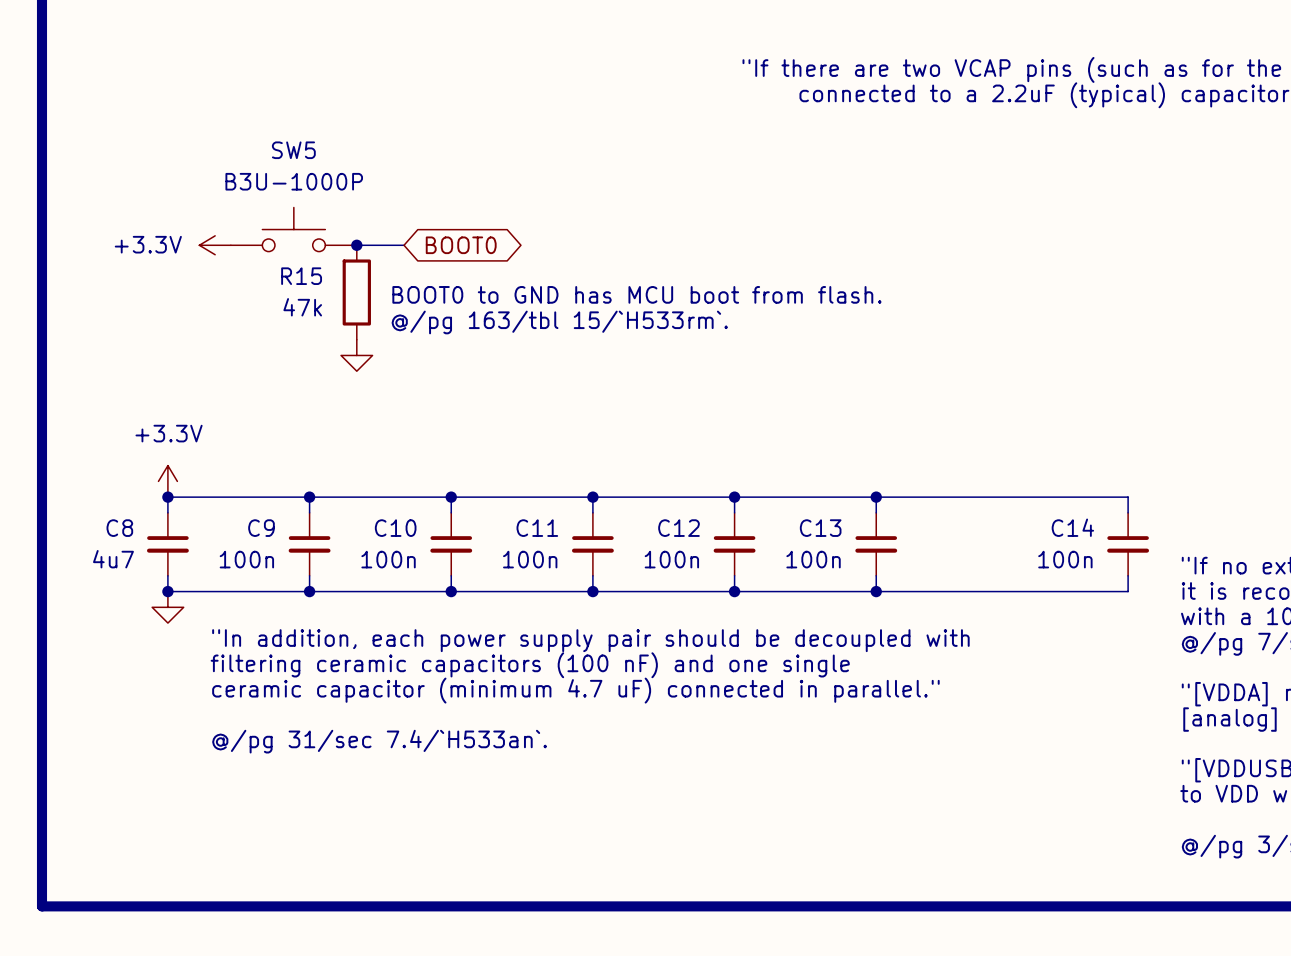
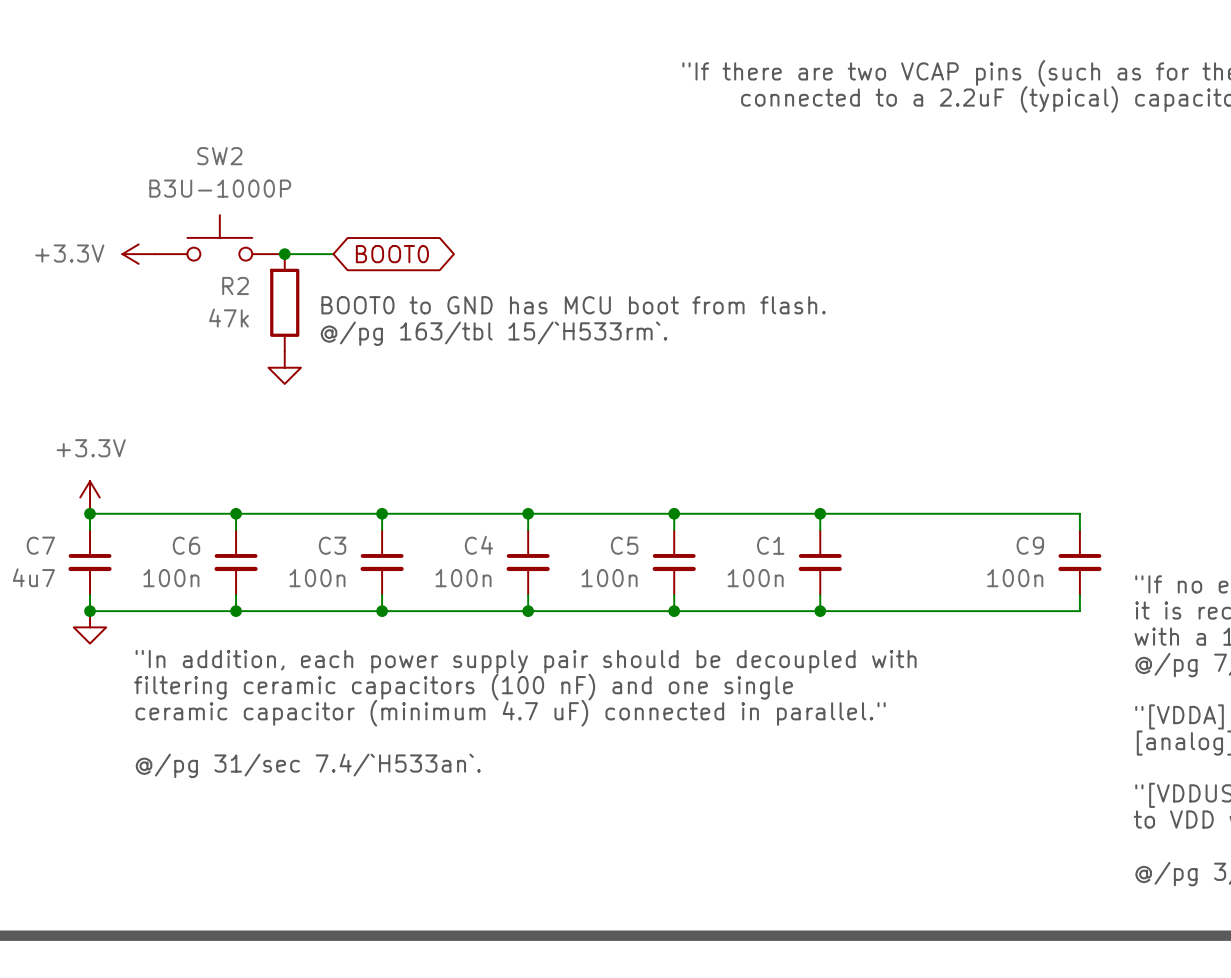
SW5 name: SW5 (293, 150) -> SW2 (219, 156)
R15 name: R15 (301, 276) -> R2 (235, 285)
C14 name: C14 (1072, 527) -> C9 (1030, 545)
C8 name: C8 (119, 528) -> C7 (40, 545)
C9 name: C9 (261, 528) -> C6 (186, 545)
C10 name: C10 (395, 528) -> C3 (332, 545)
C11 name: C11 (537, 528) -> C4 (478, 545)
C12 name: C12 (678, 528) -> C5 (624, 545)
C13 name: C13 (820, 528) -> C1 (770, 545)

